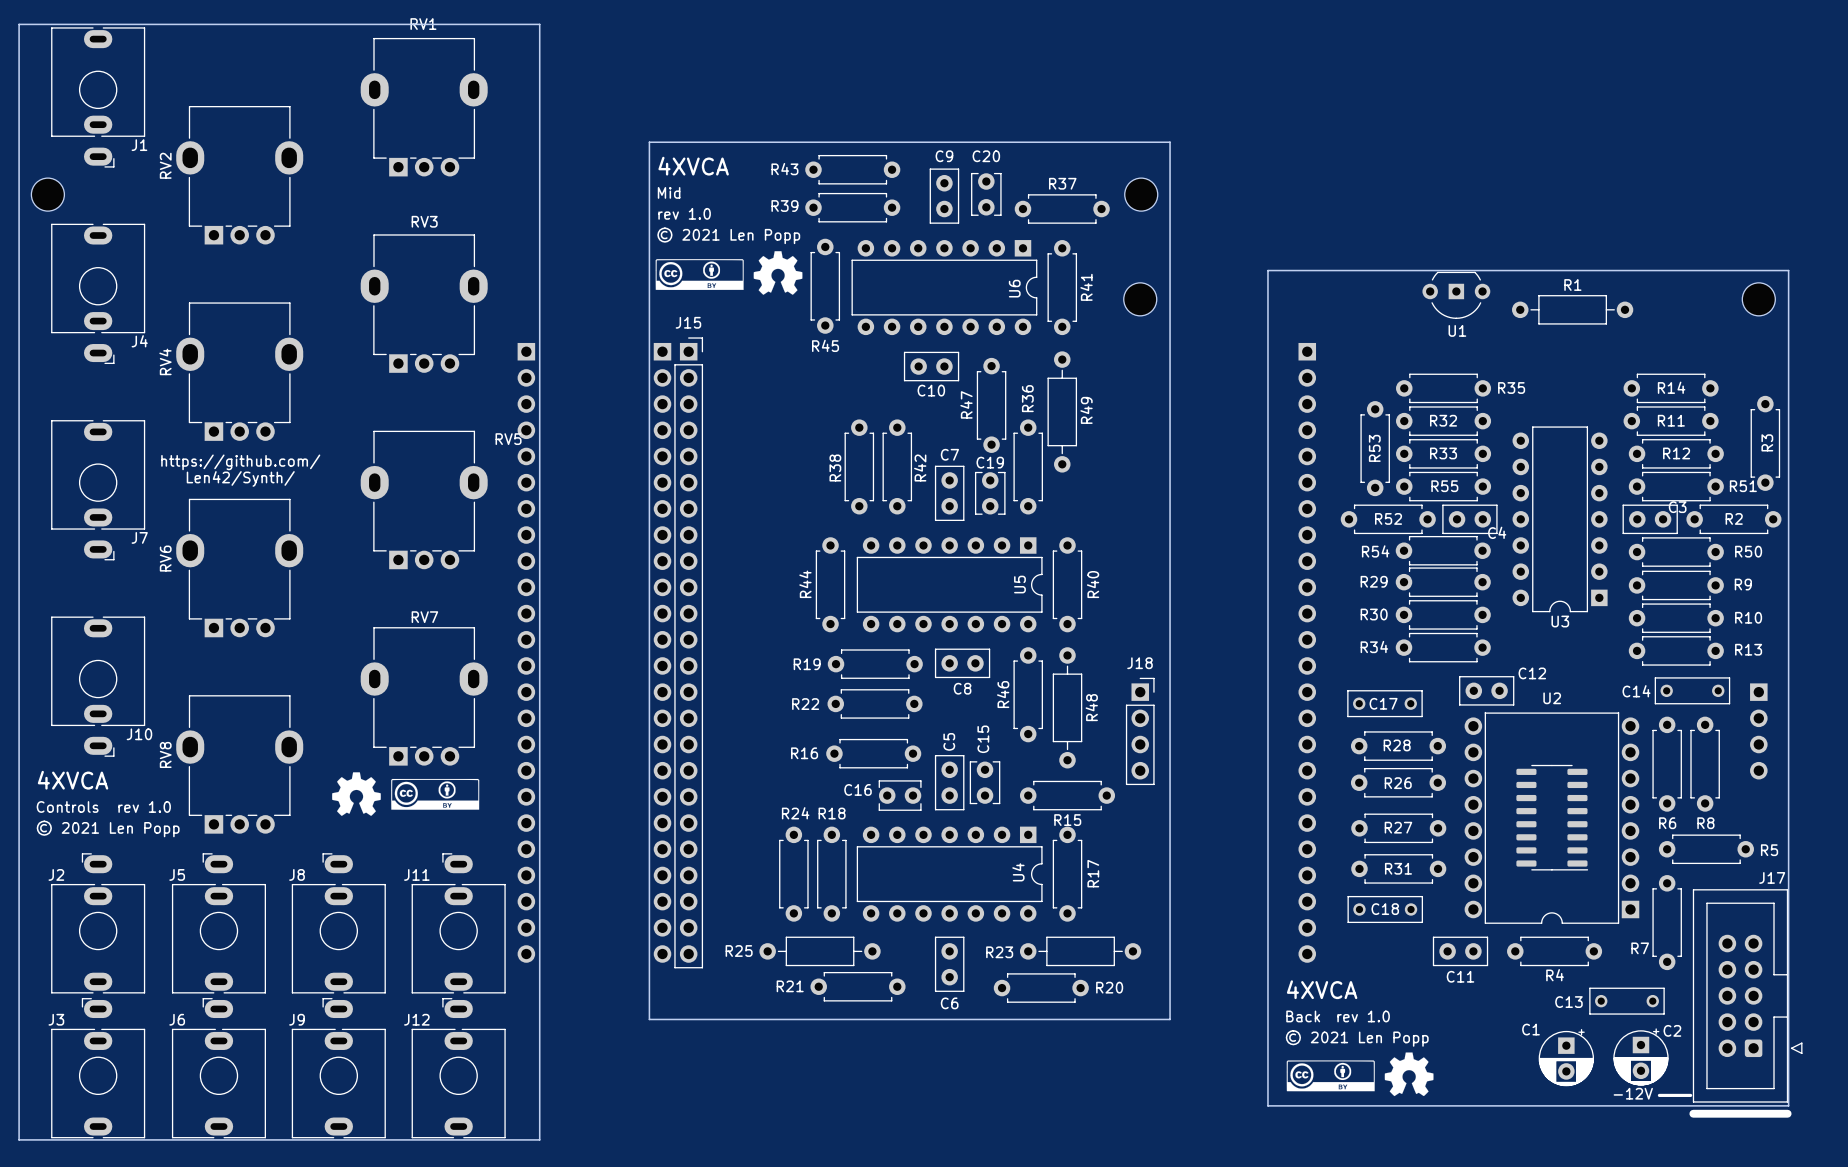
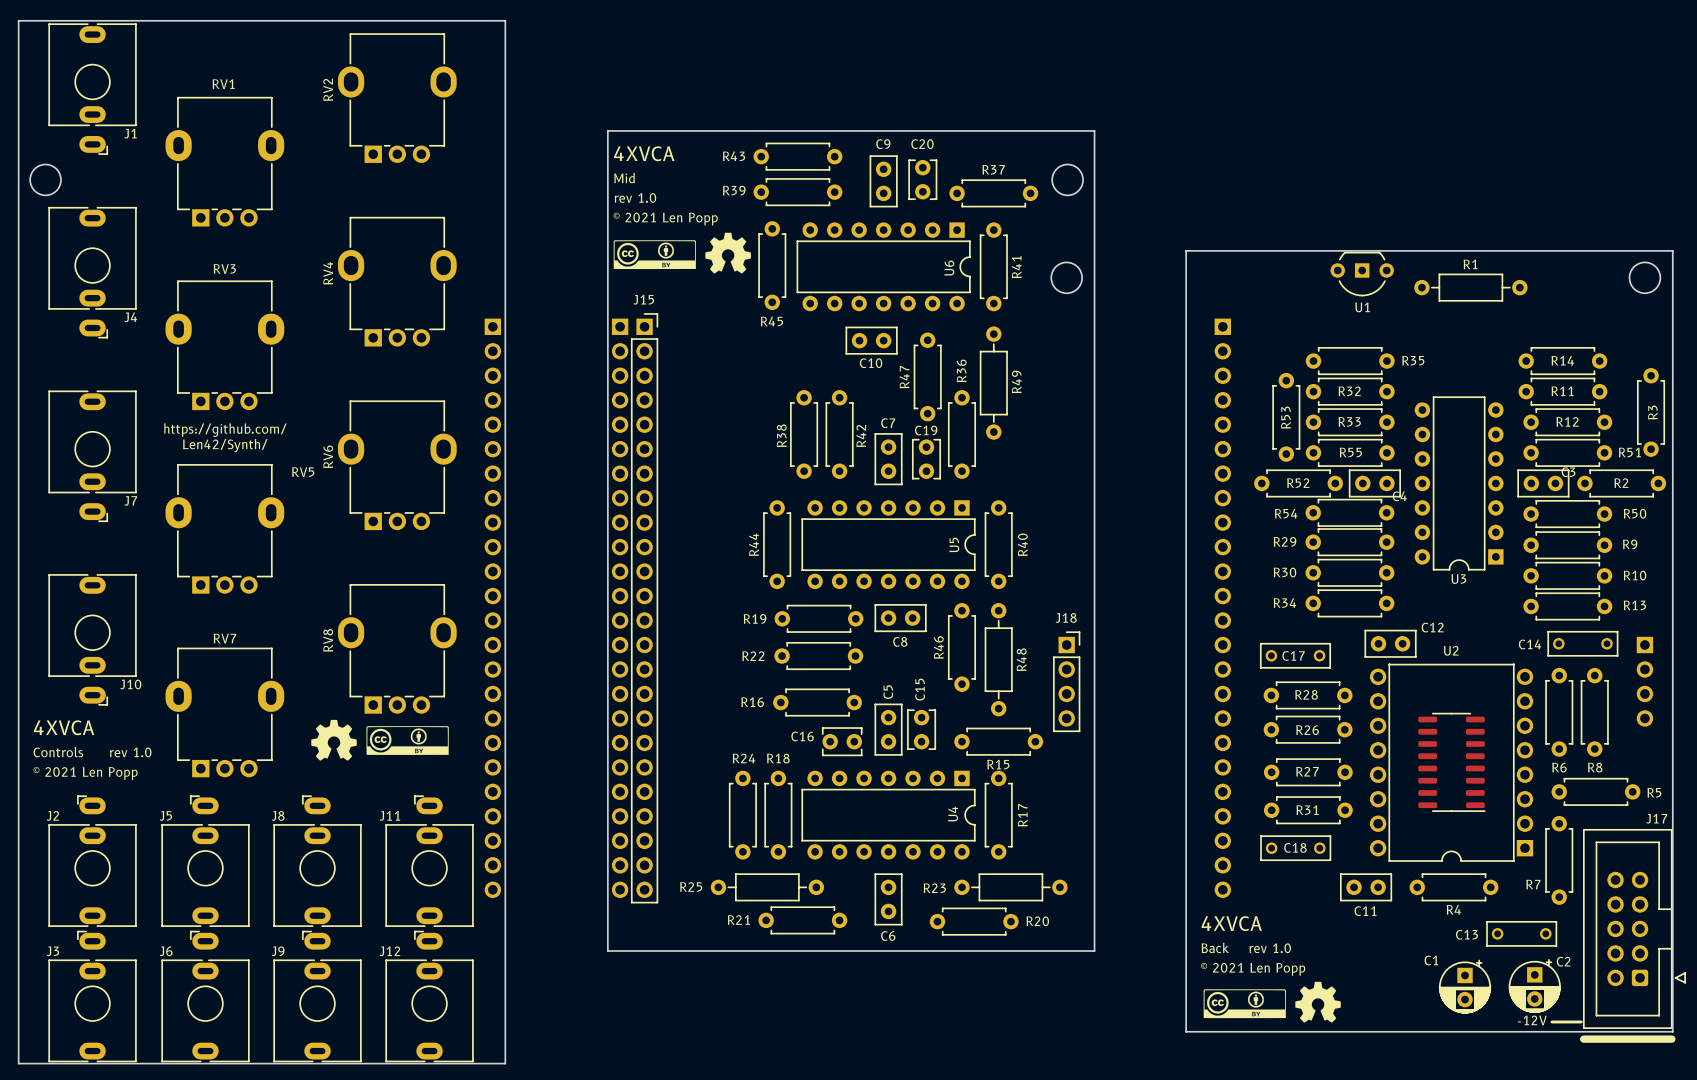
RV1 position: (424, 107) -> (224, 161)
RV2 position: (239, 175) -> (397, 98)
RV3 position: (424, 303) -> (224, 345)
RV4 position: (239, 371) -> (397, 281)
RV5 position: (424, 500) -> (224, 529)
RV6 position: (239, 568) -> (397, 465)
RV7 position: (424, 696) -> (224, 712)
RV8 position: (239, 764) -> (397, 648)

